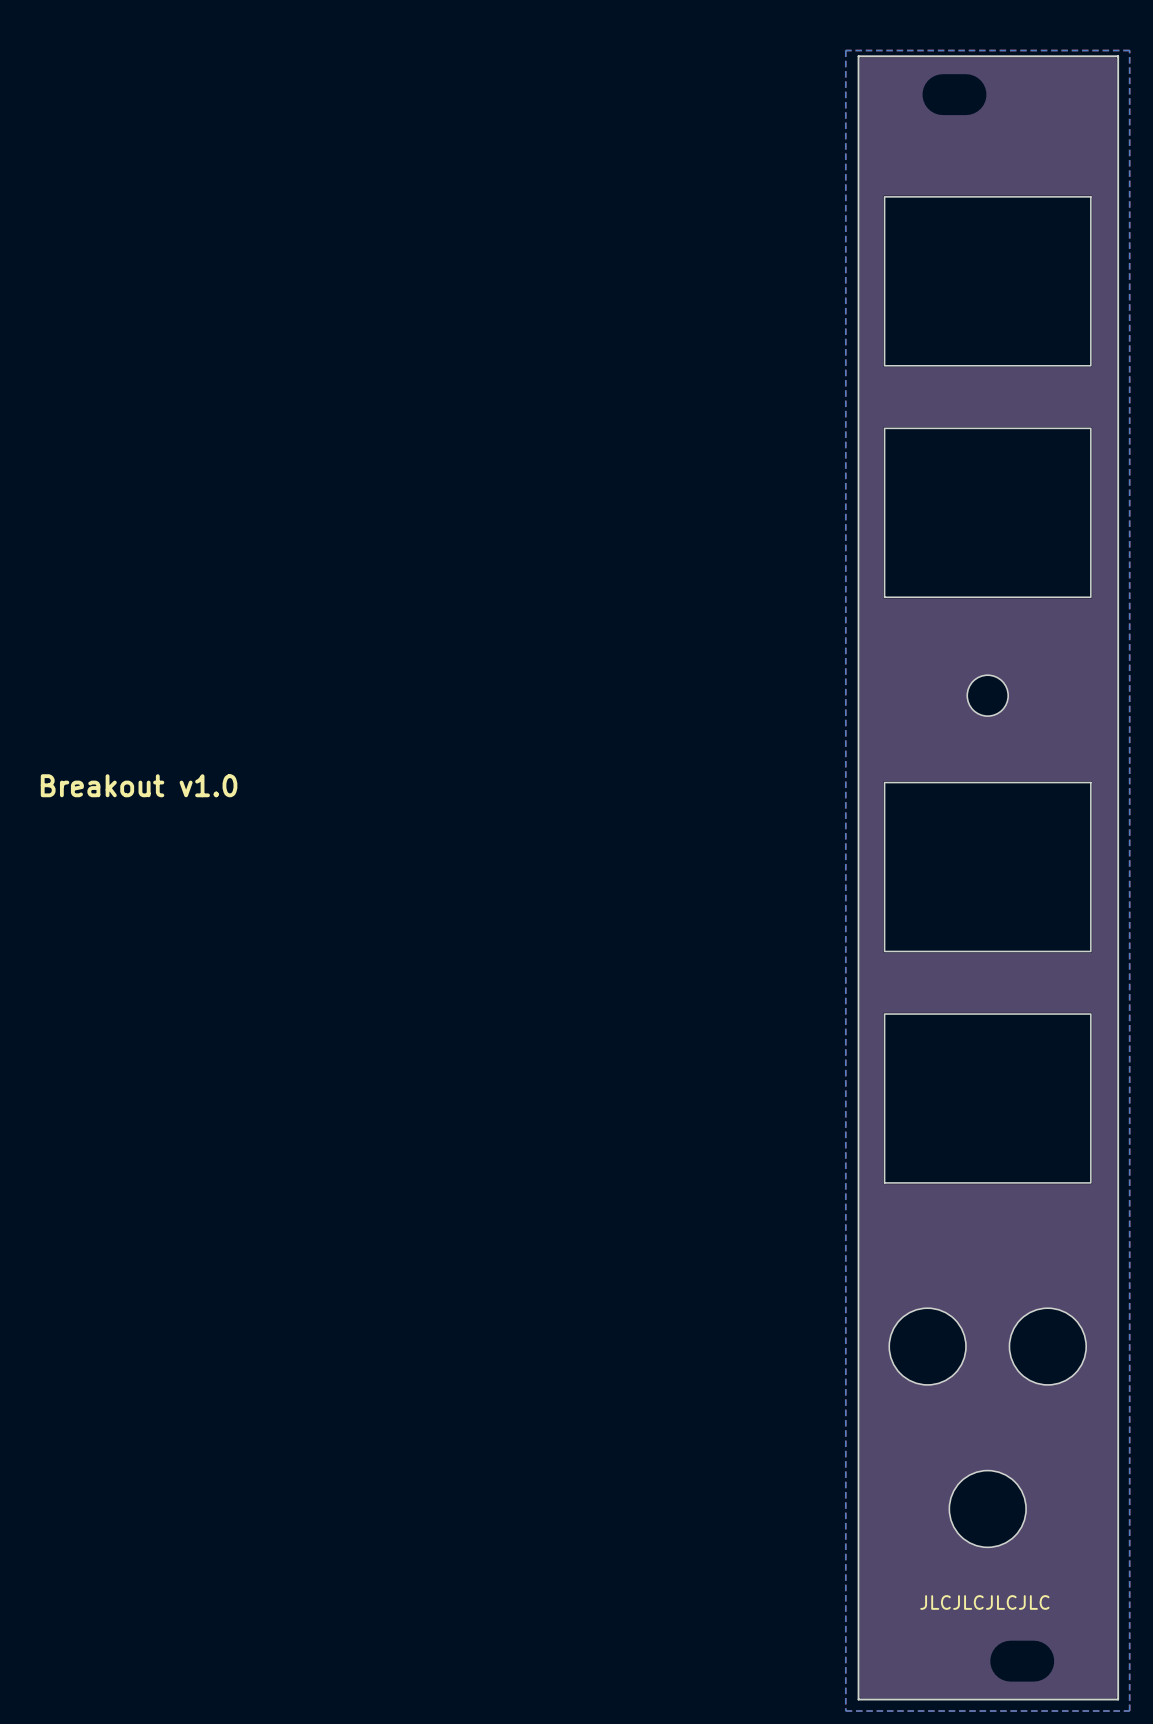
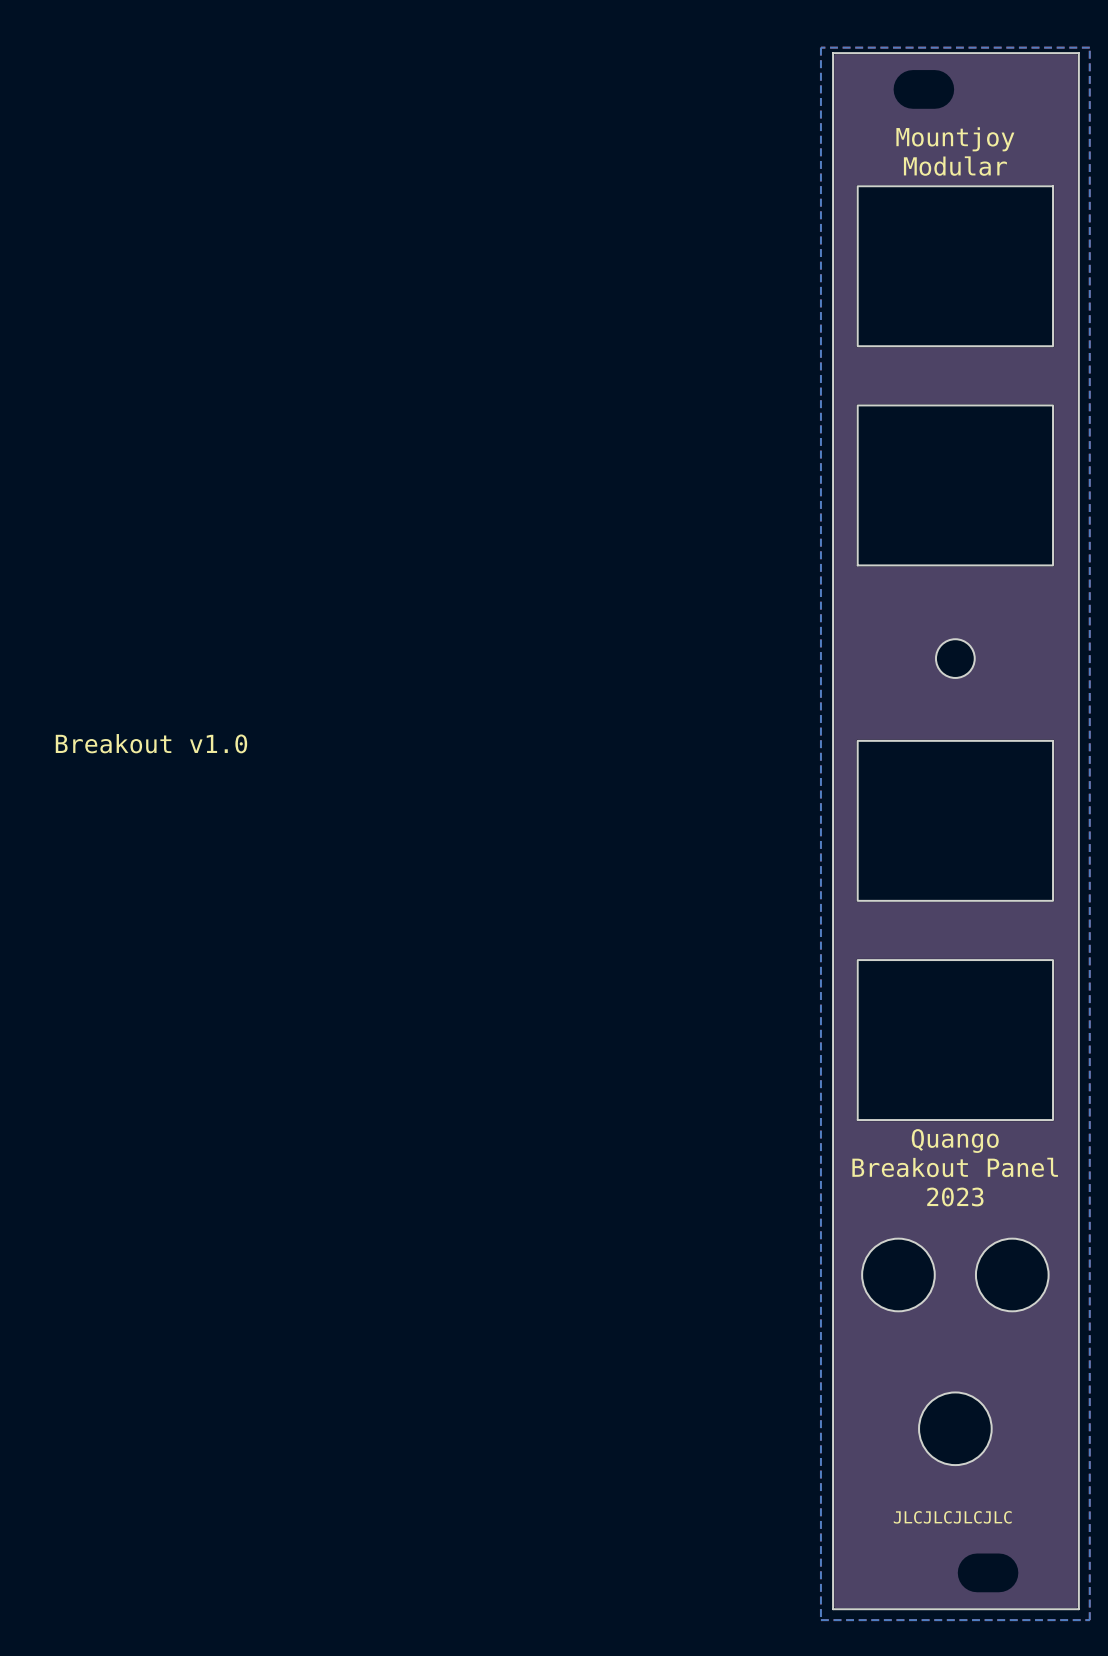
text: none -> Mountjoy (955, 139)
text: none -> Modular (955, 166)
text: none -> Quango (955, 1141)
text: none -> Breakout Panel (955, 1167)
text: none -> 2023 (955, 1196)

